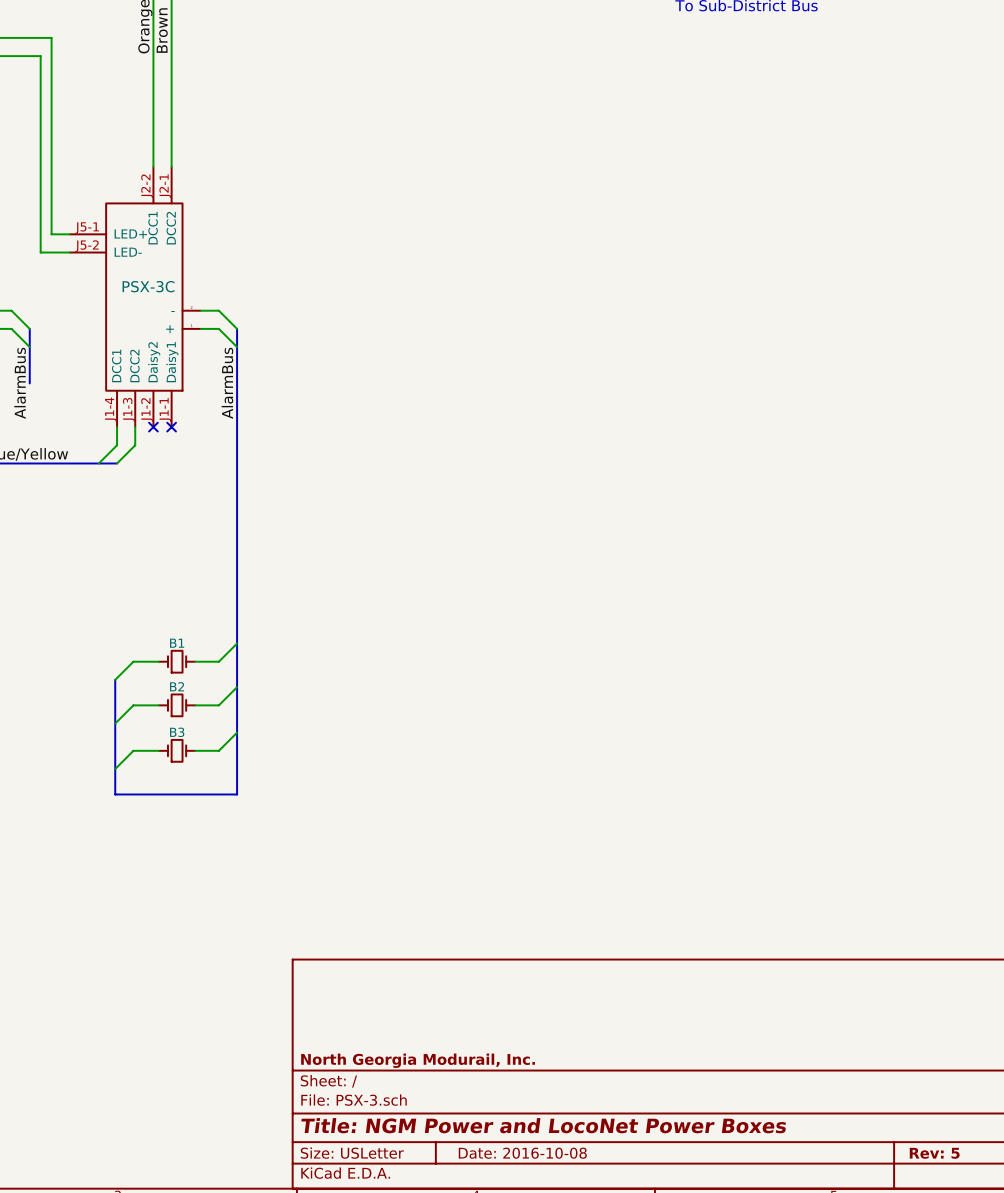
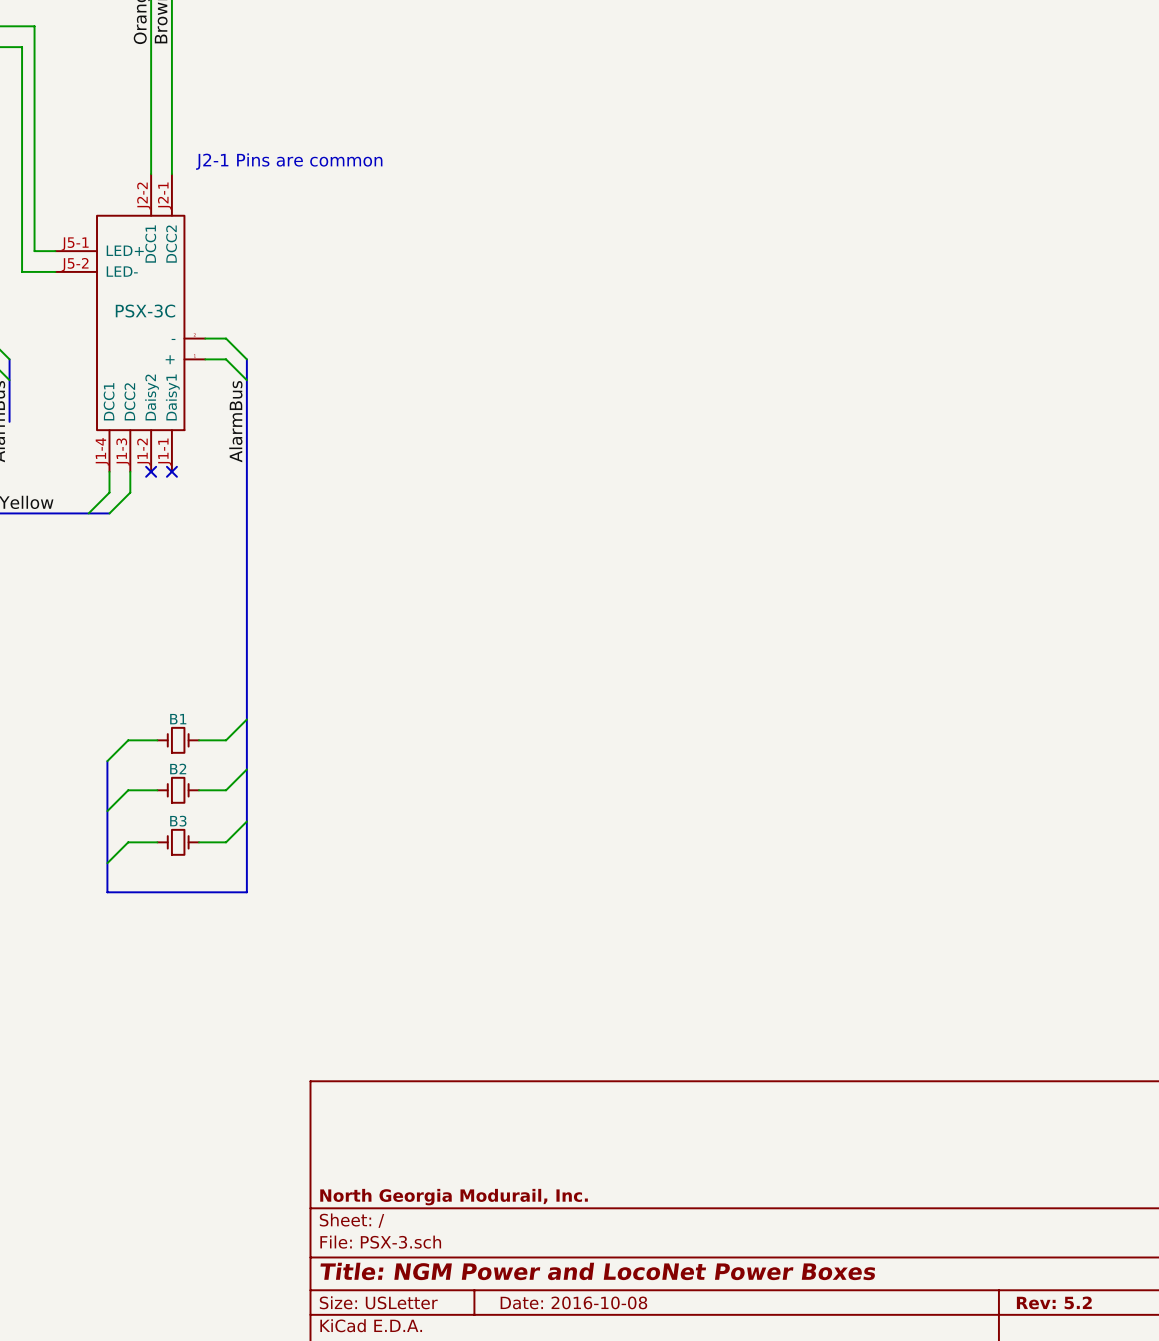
text: none -> J2-1 Pins are common (289, 161)
title block: Rev: 5 (934, 1153) -> Rev: 5.2 (1054, 1302)

